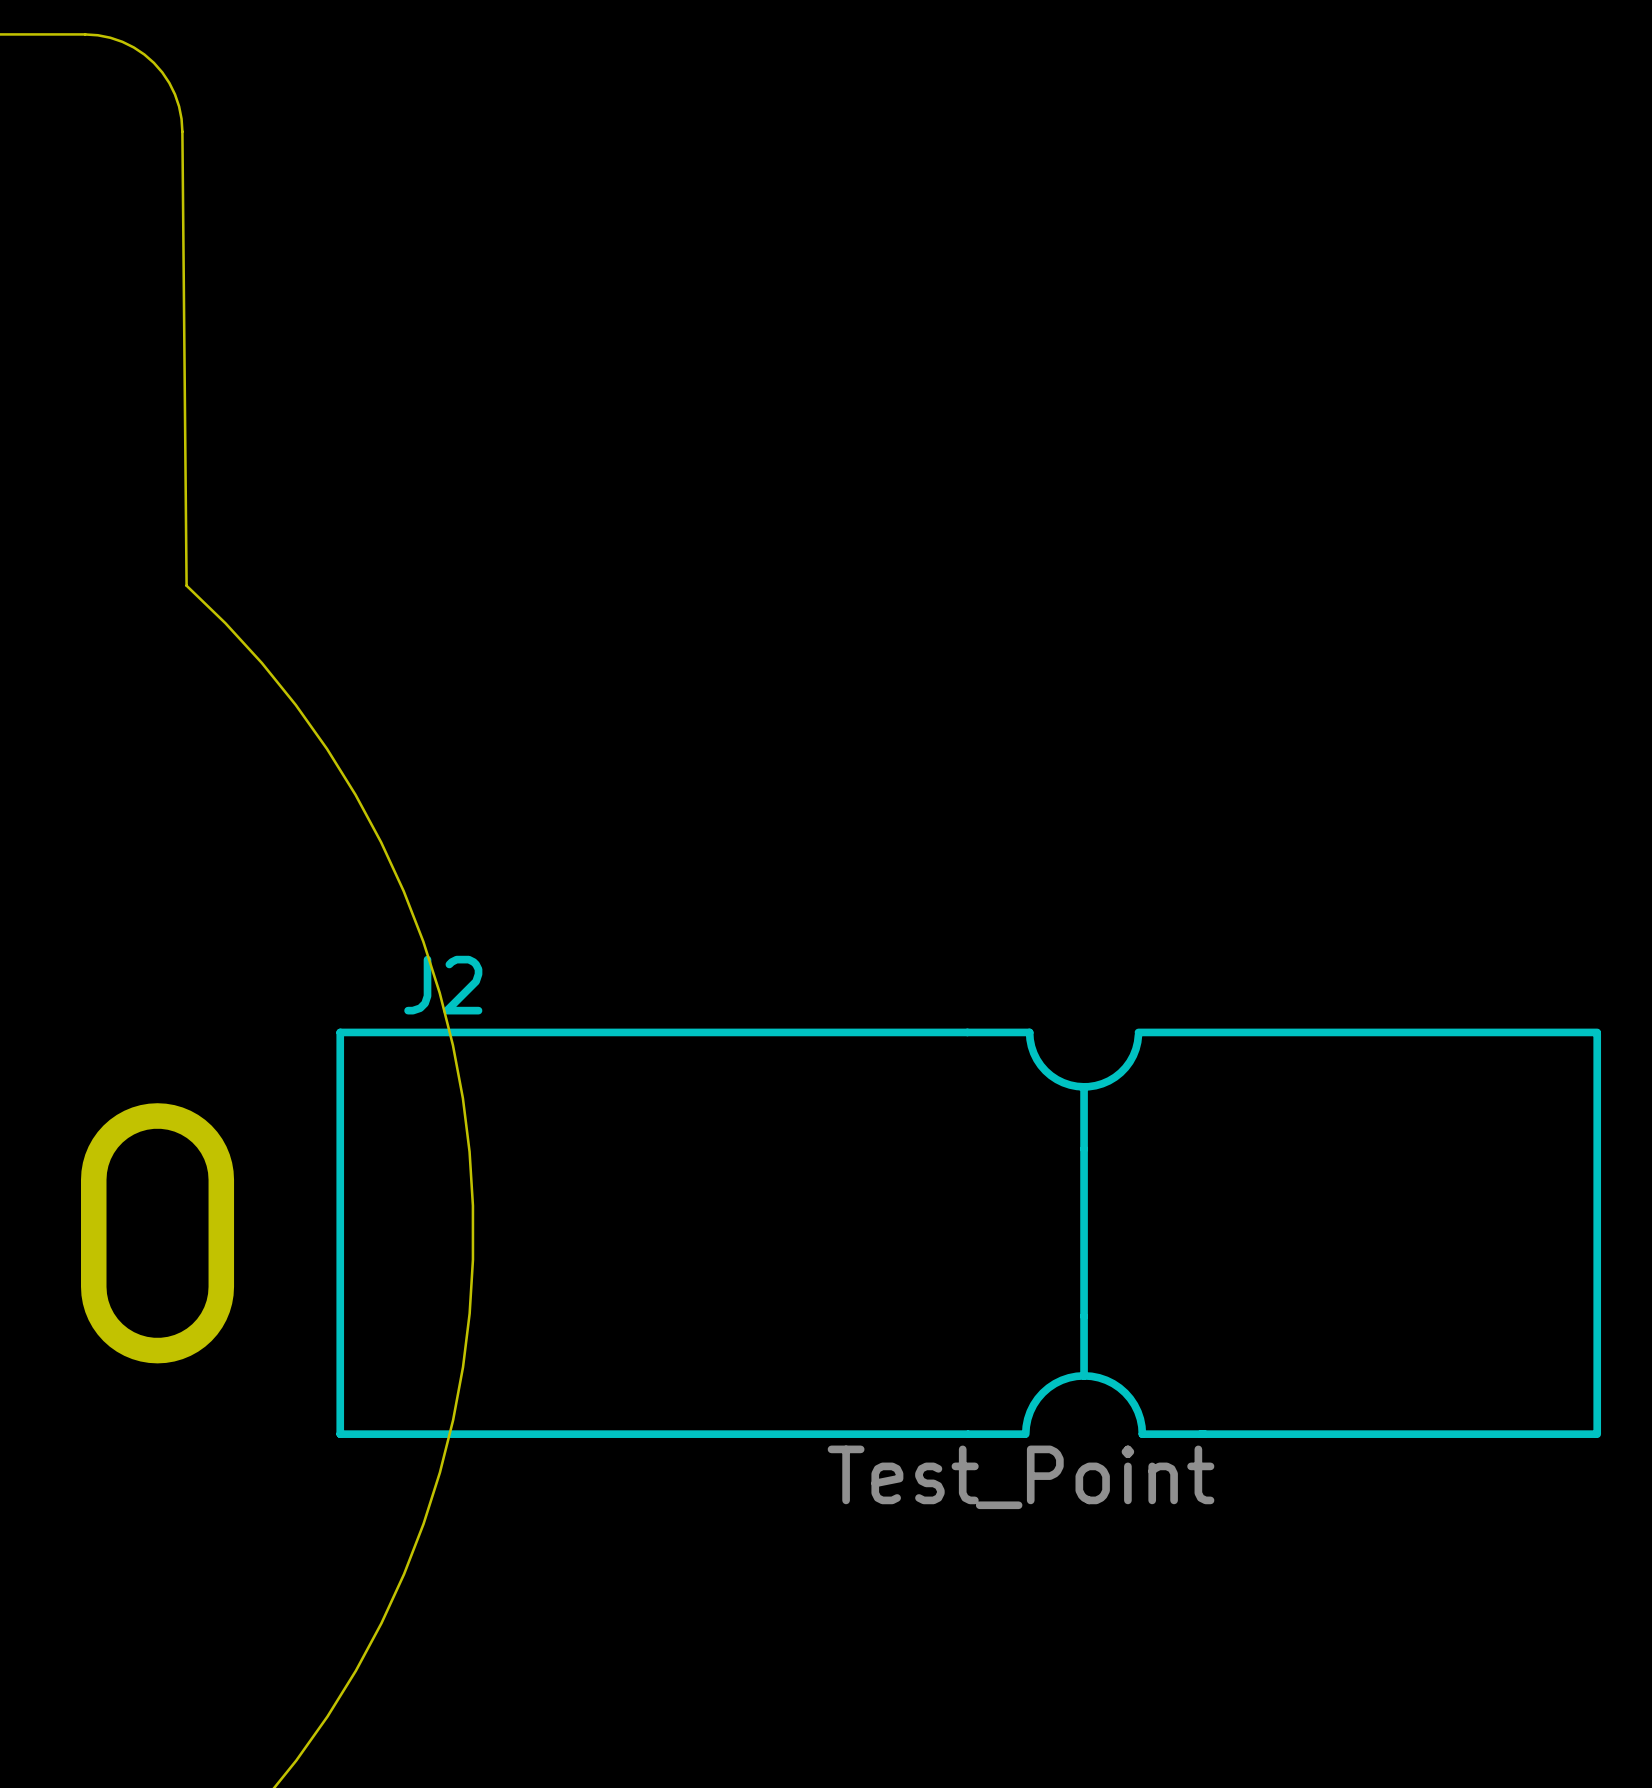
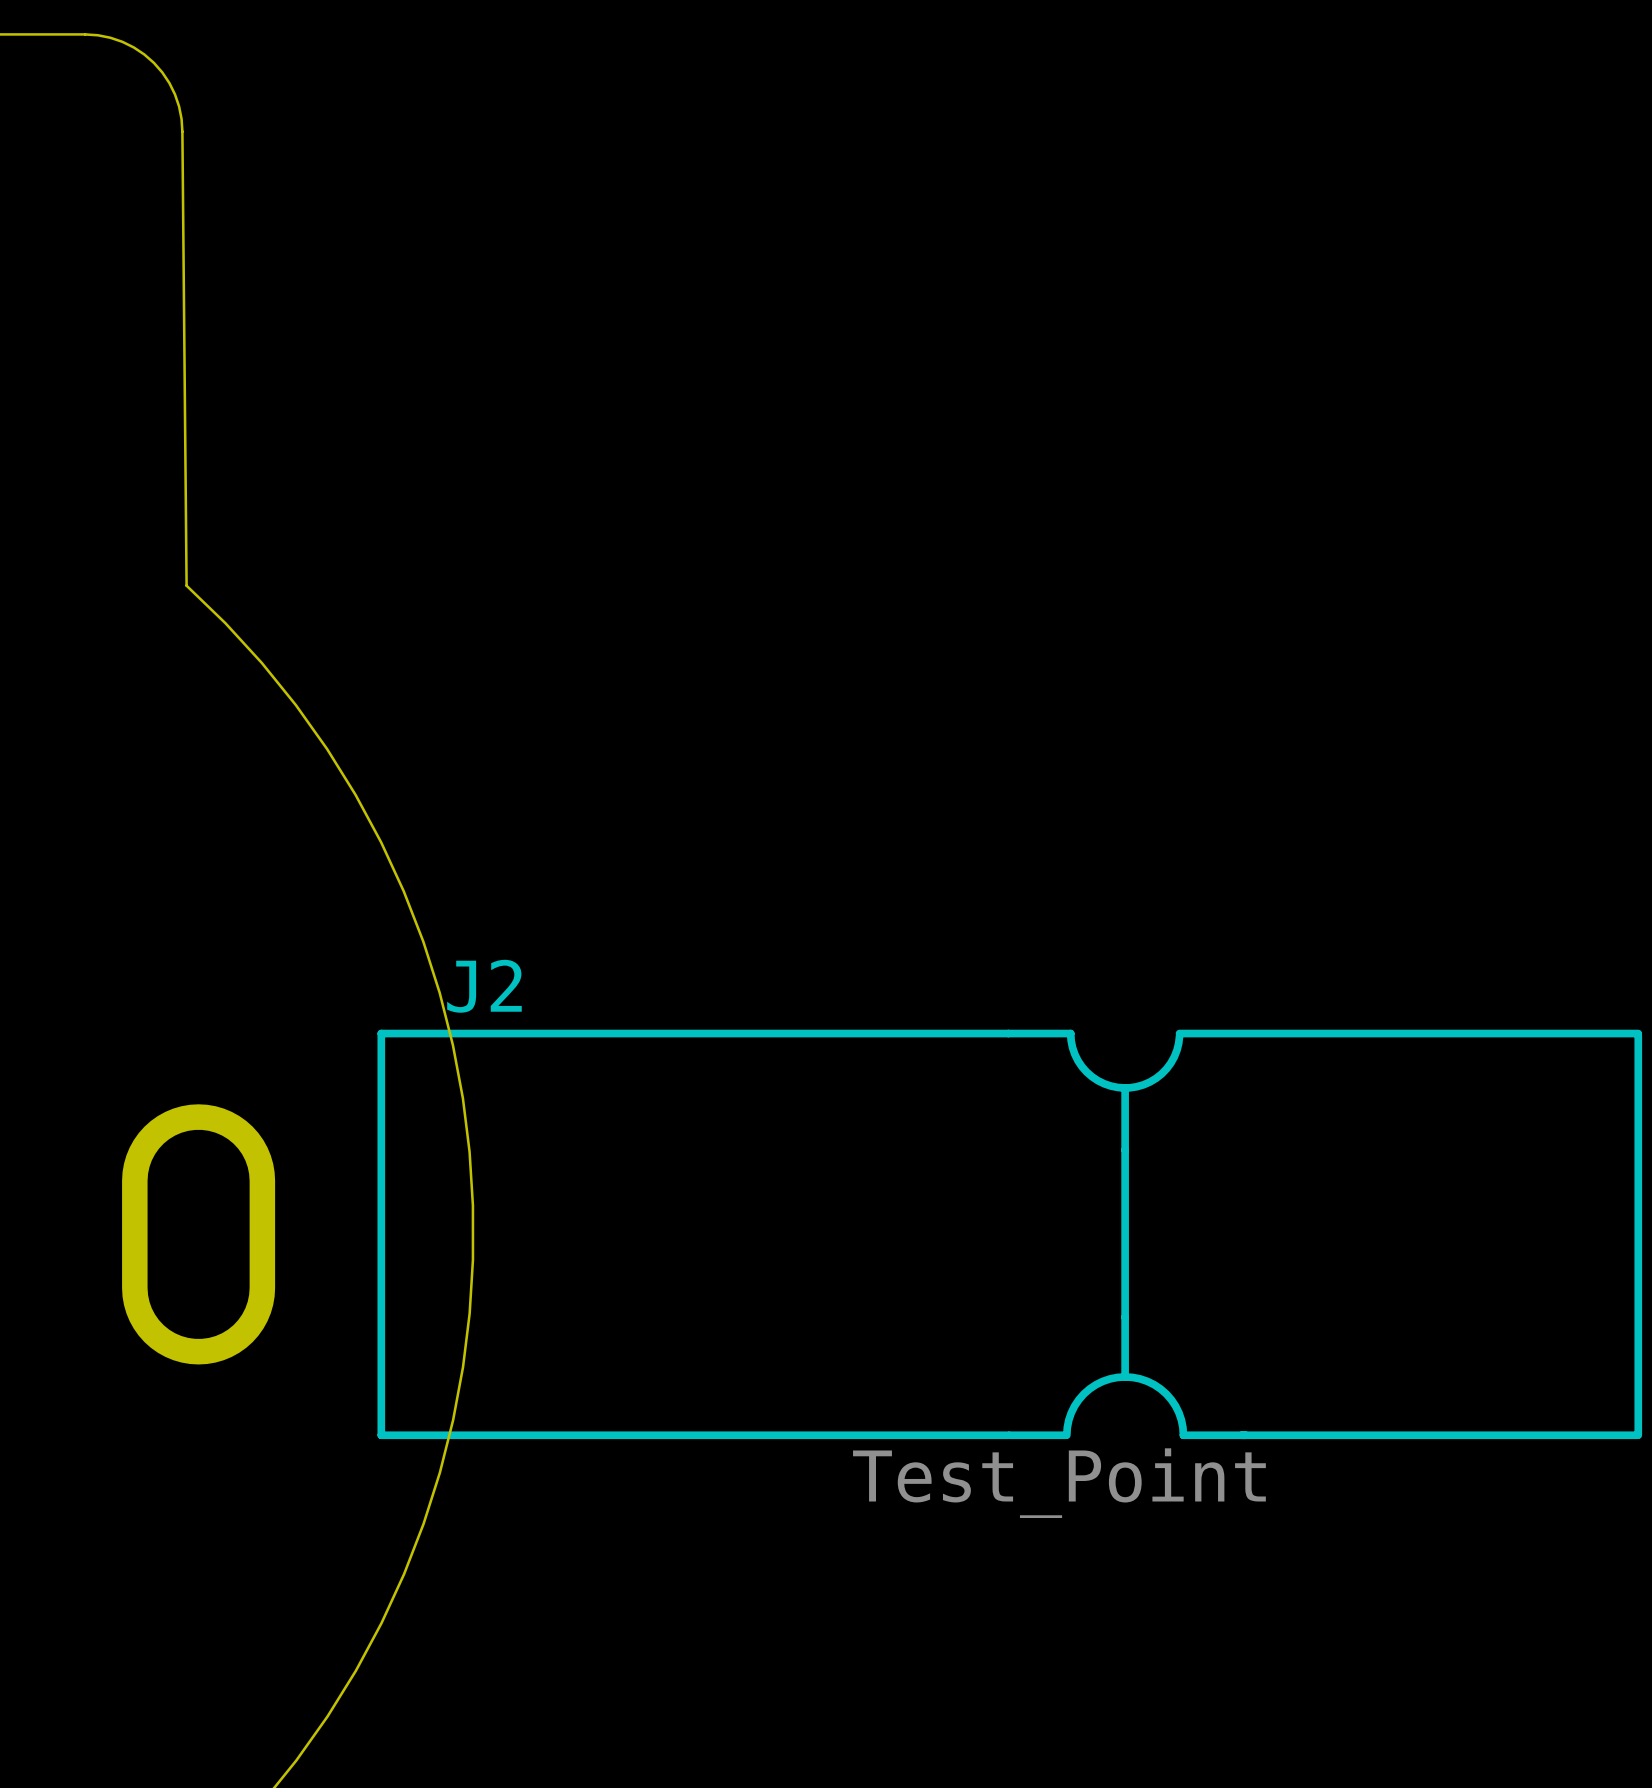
J2 position: (841, 1233) -> (882, 1234)

